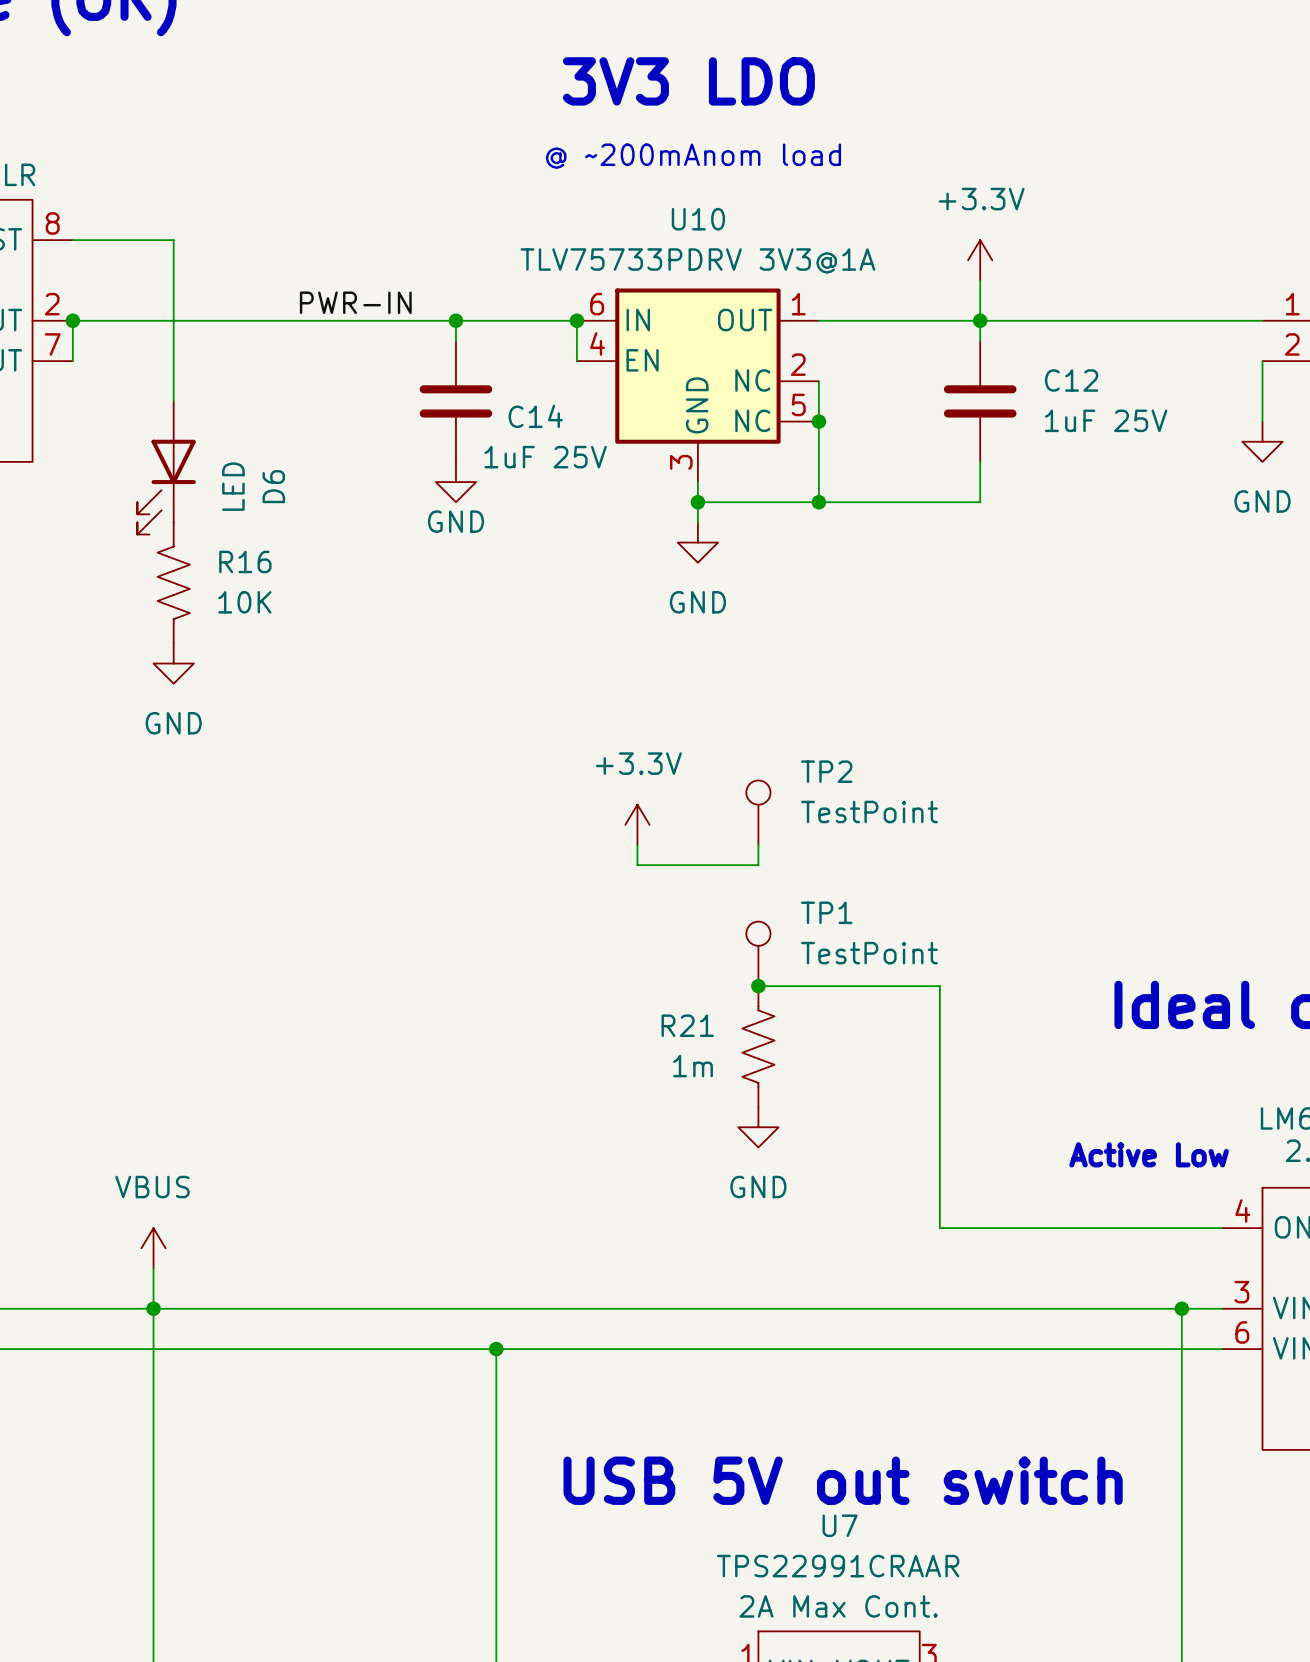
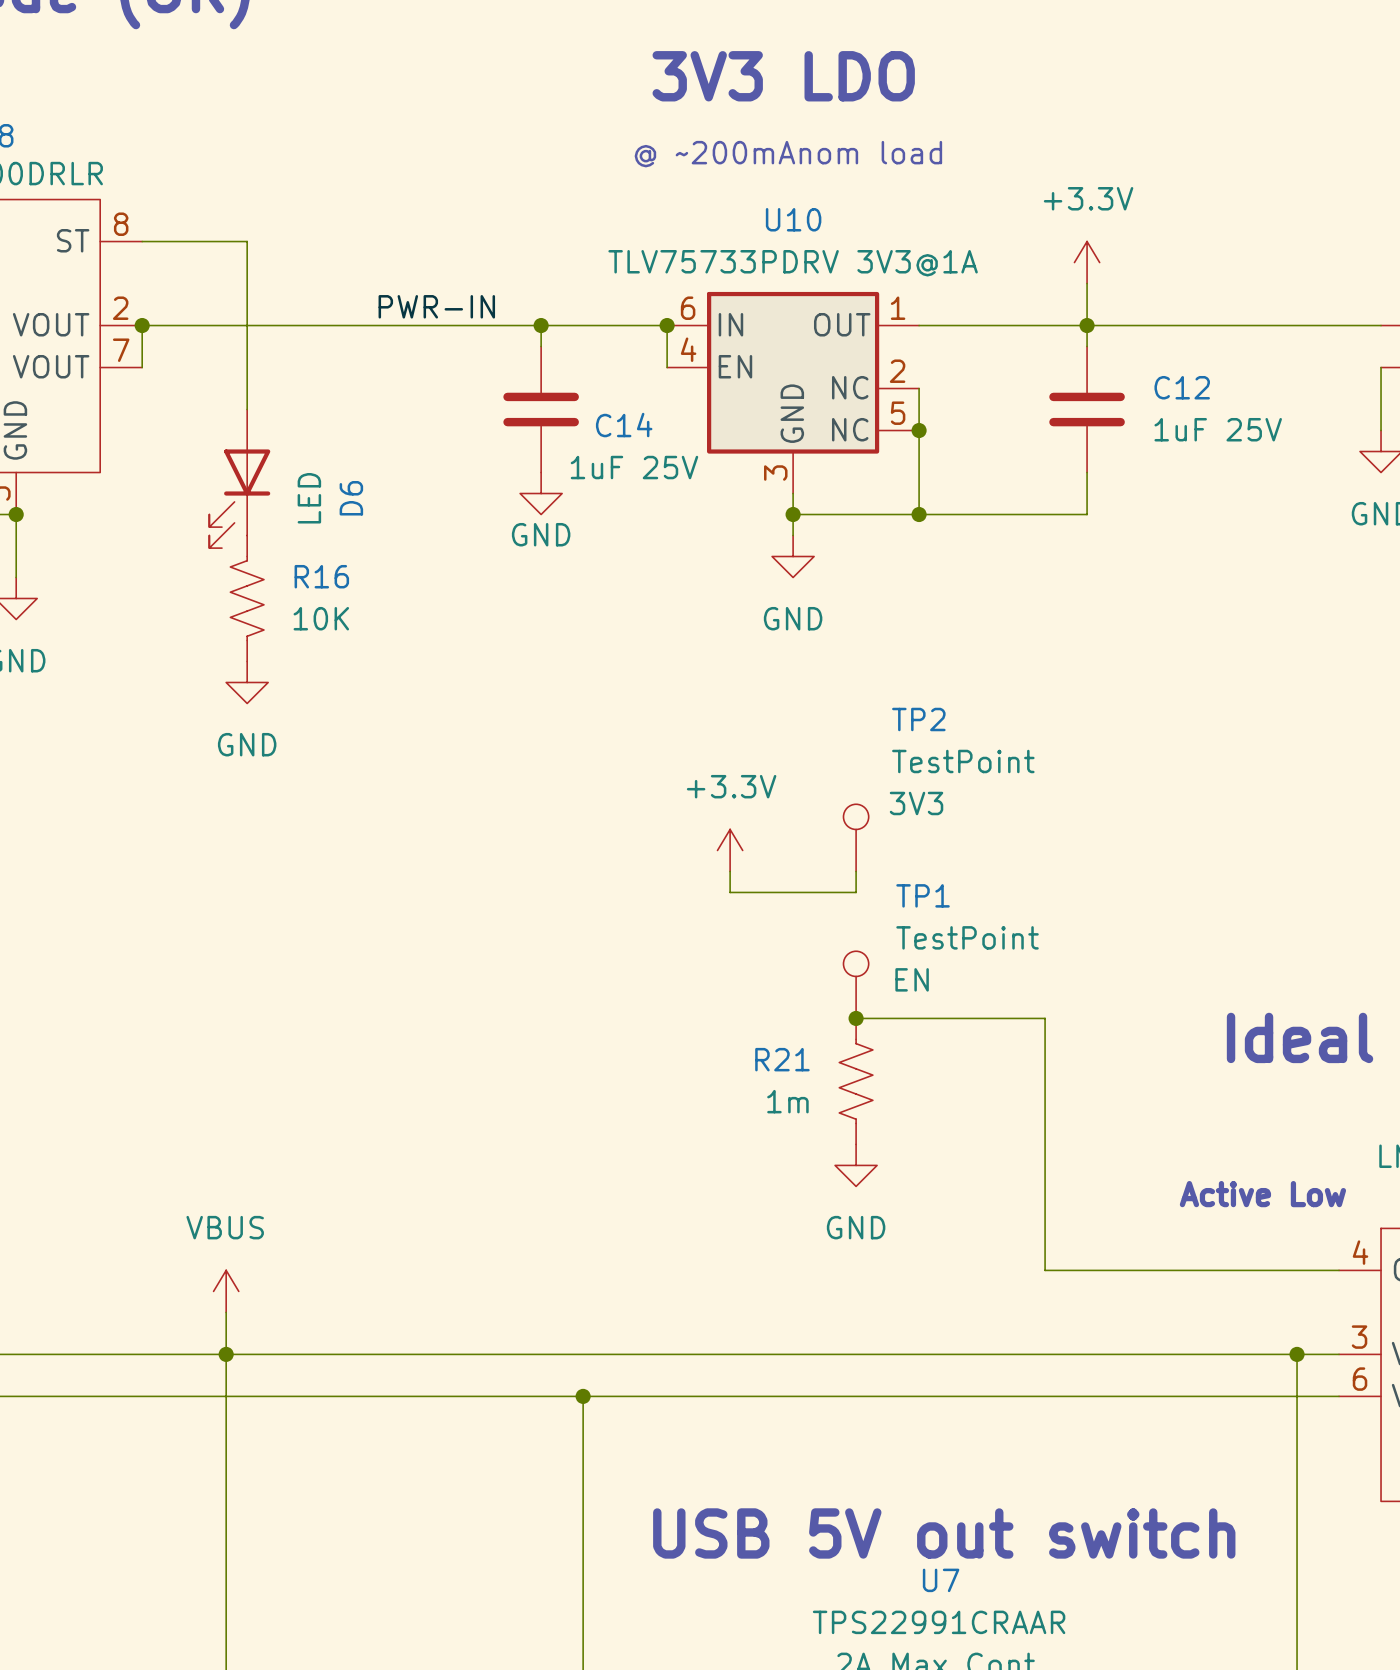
TP2 name position: TP2 (826, 771) -> TP2 (918, 719)
TP2 text: none -> 3V3 (916, 803)
TP2 value position: TestPoint (869, 811) -> TestPoint (963, 761)
TP1 name position: TP1 (826, 912) -> TP1 (923, 895)
TP1 text: none -> EN (912, 979)
TP1 value position: TestPoint (869, 953) -> TestPoint (967, 937)

